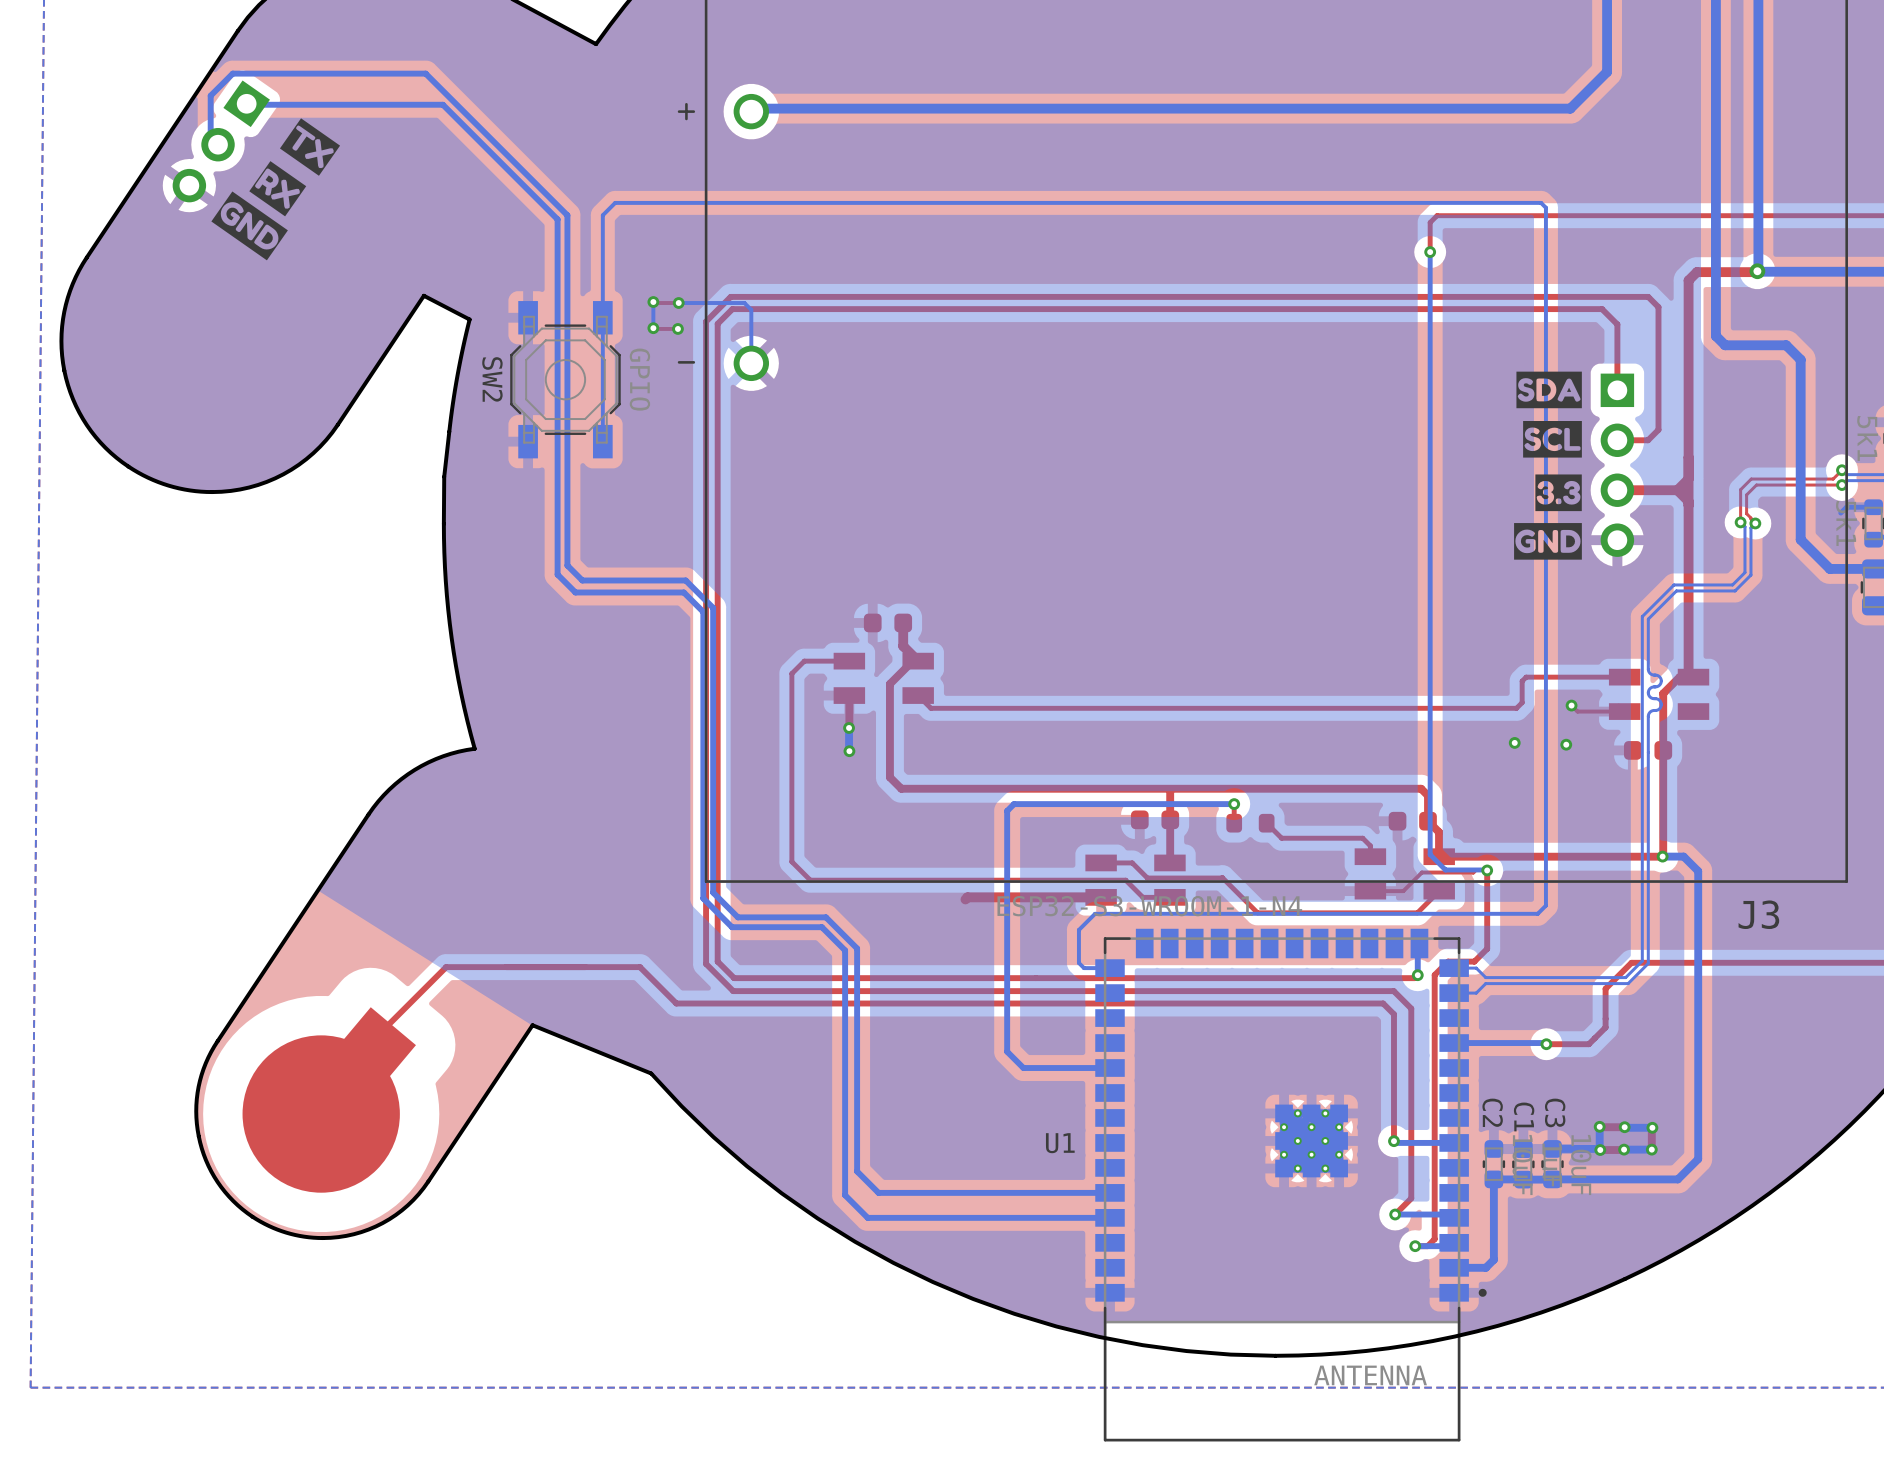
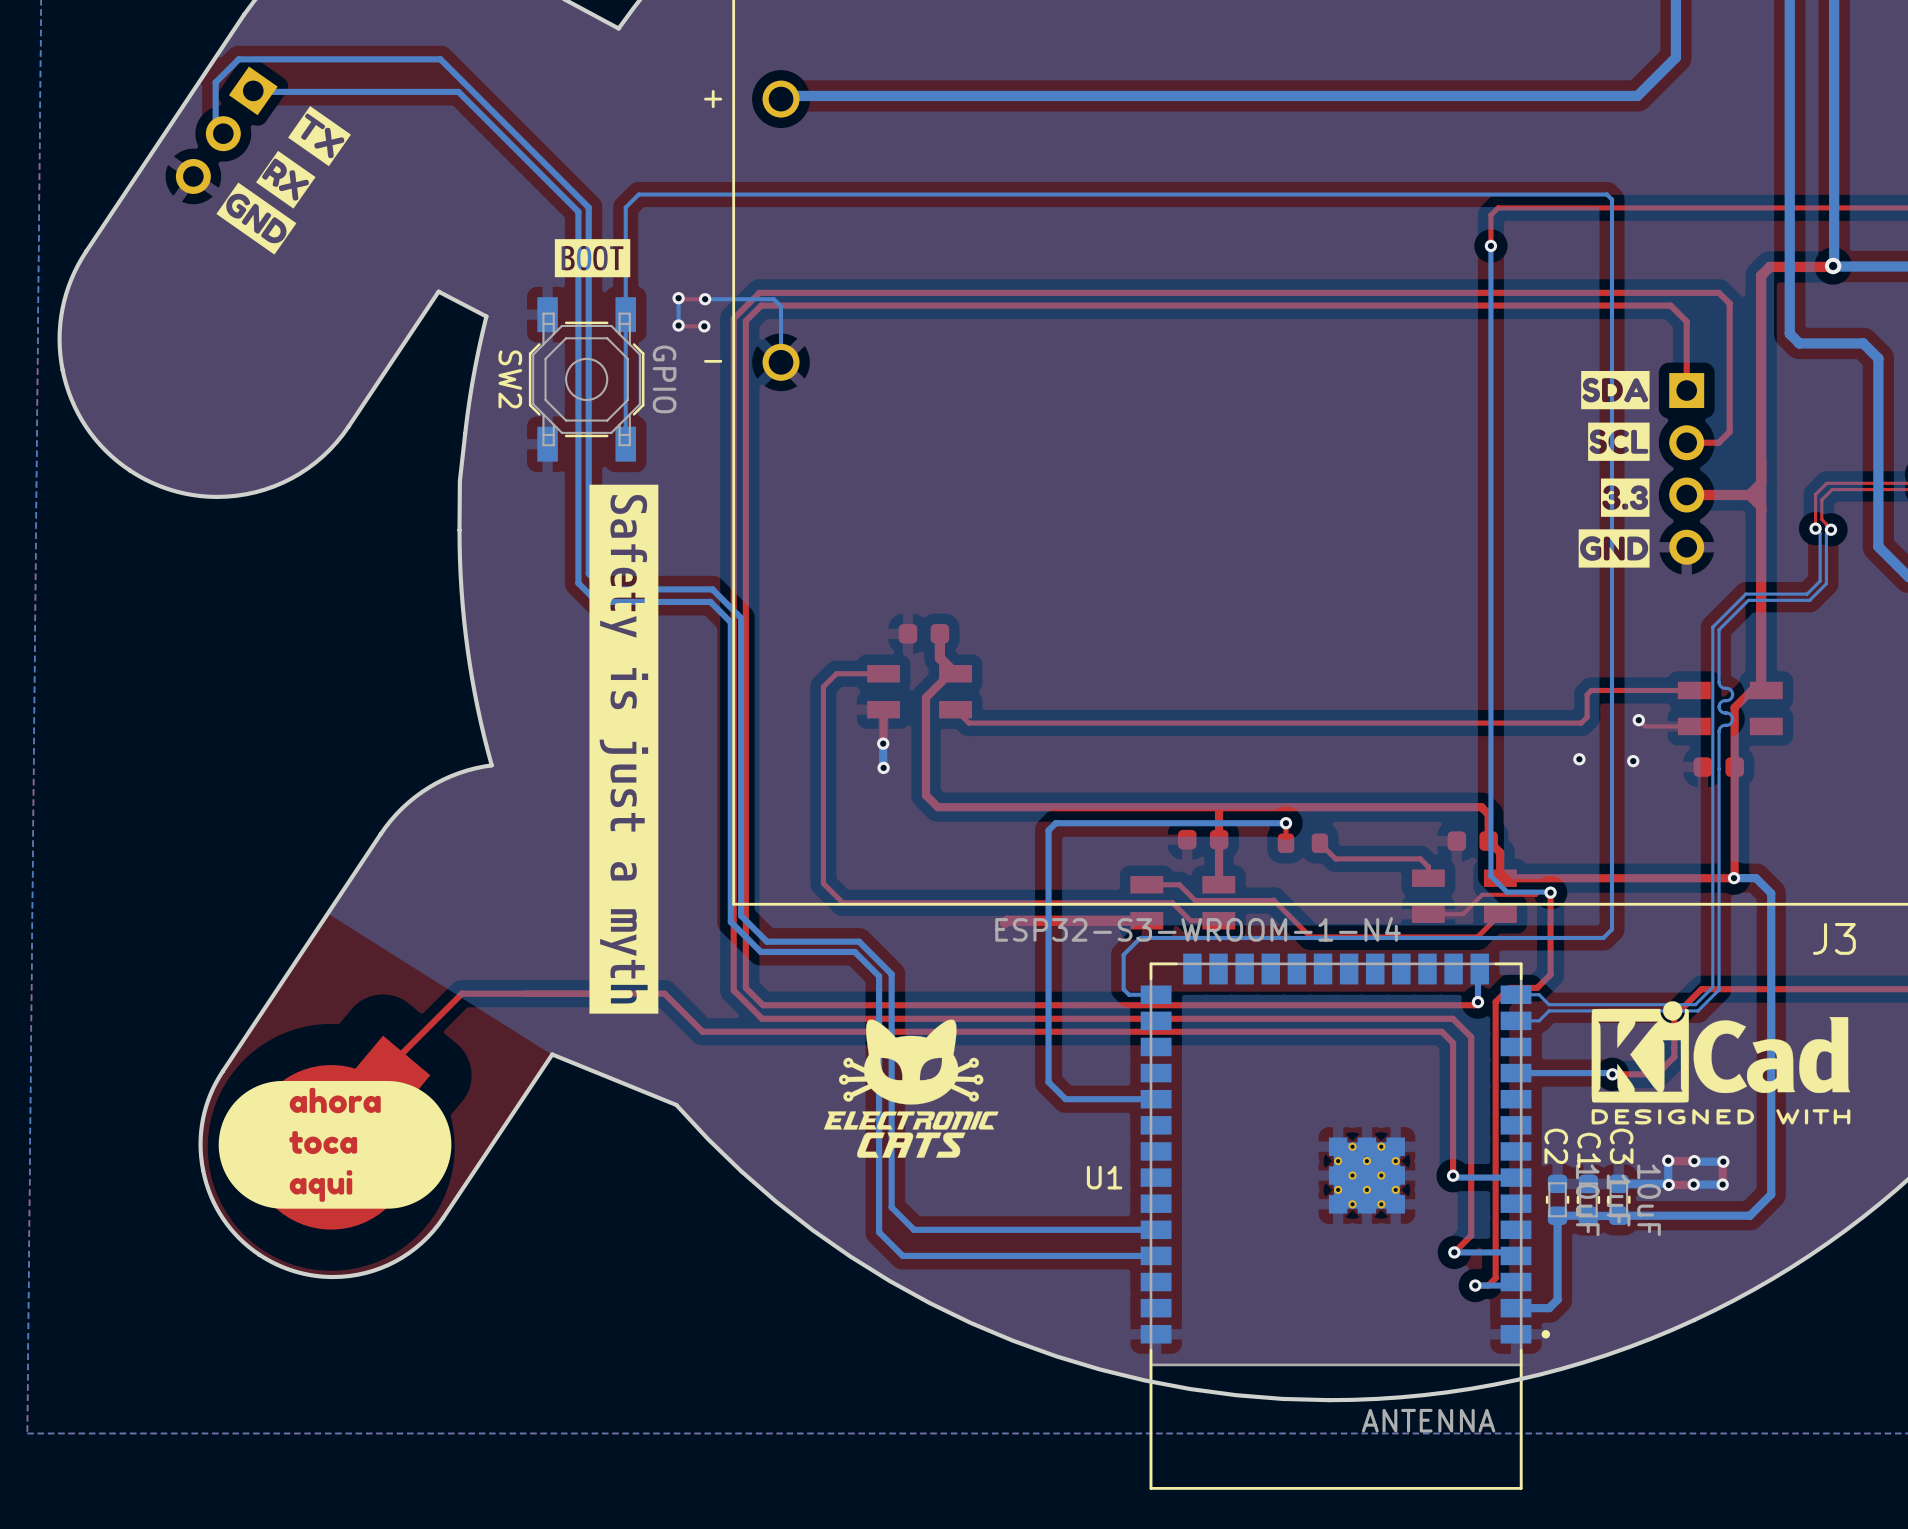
drawing: none -> [554, 239, 631, 278]
drawing: none -> [589, 484, 659, 1014]
drawing: none -> [1591, 1001, 1851, 1125]
drawing: none -> [824, 1019, 999, 1158]
drawing: none -> [218, 1080, 452, 1209]

